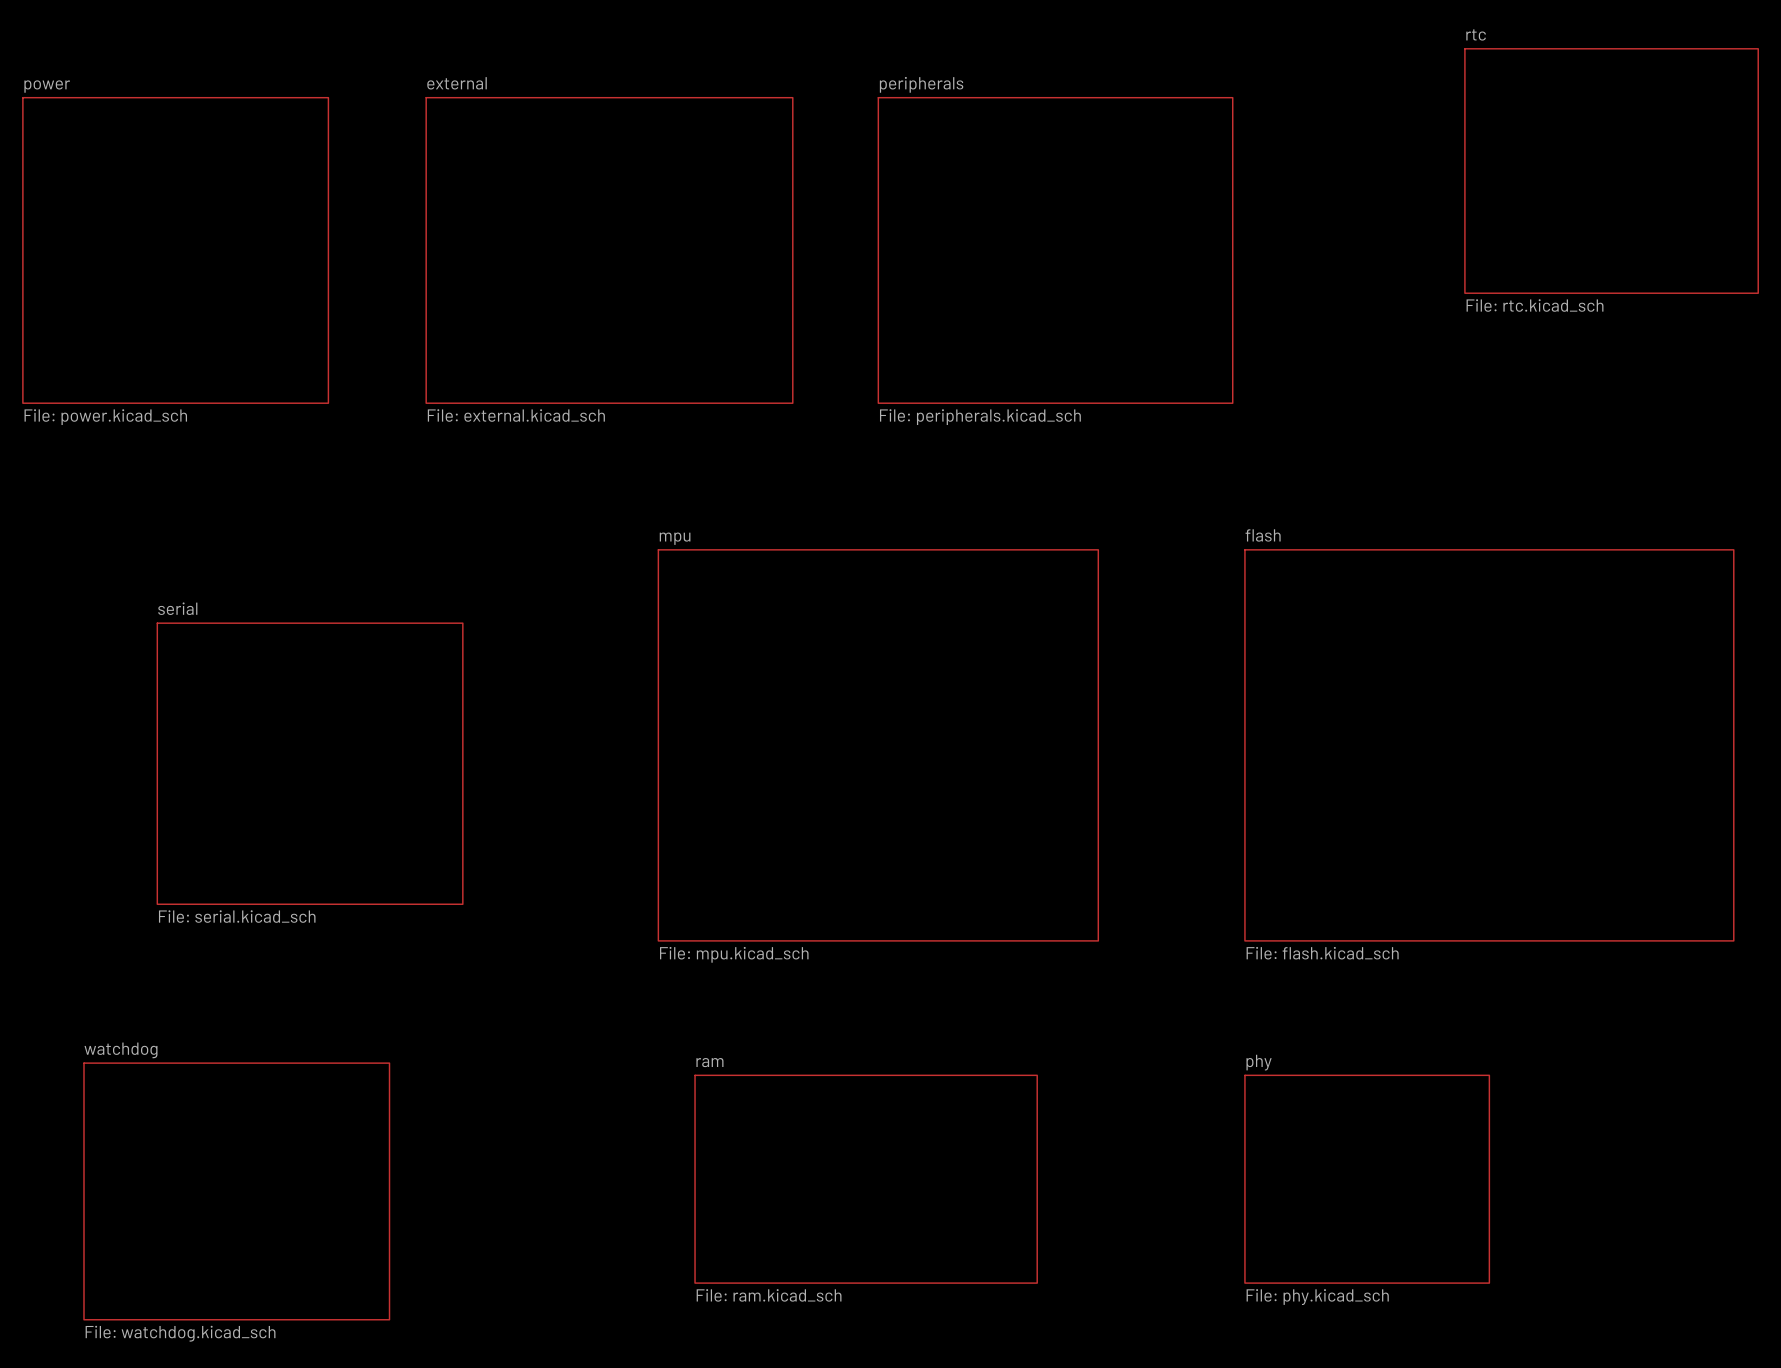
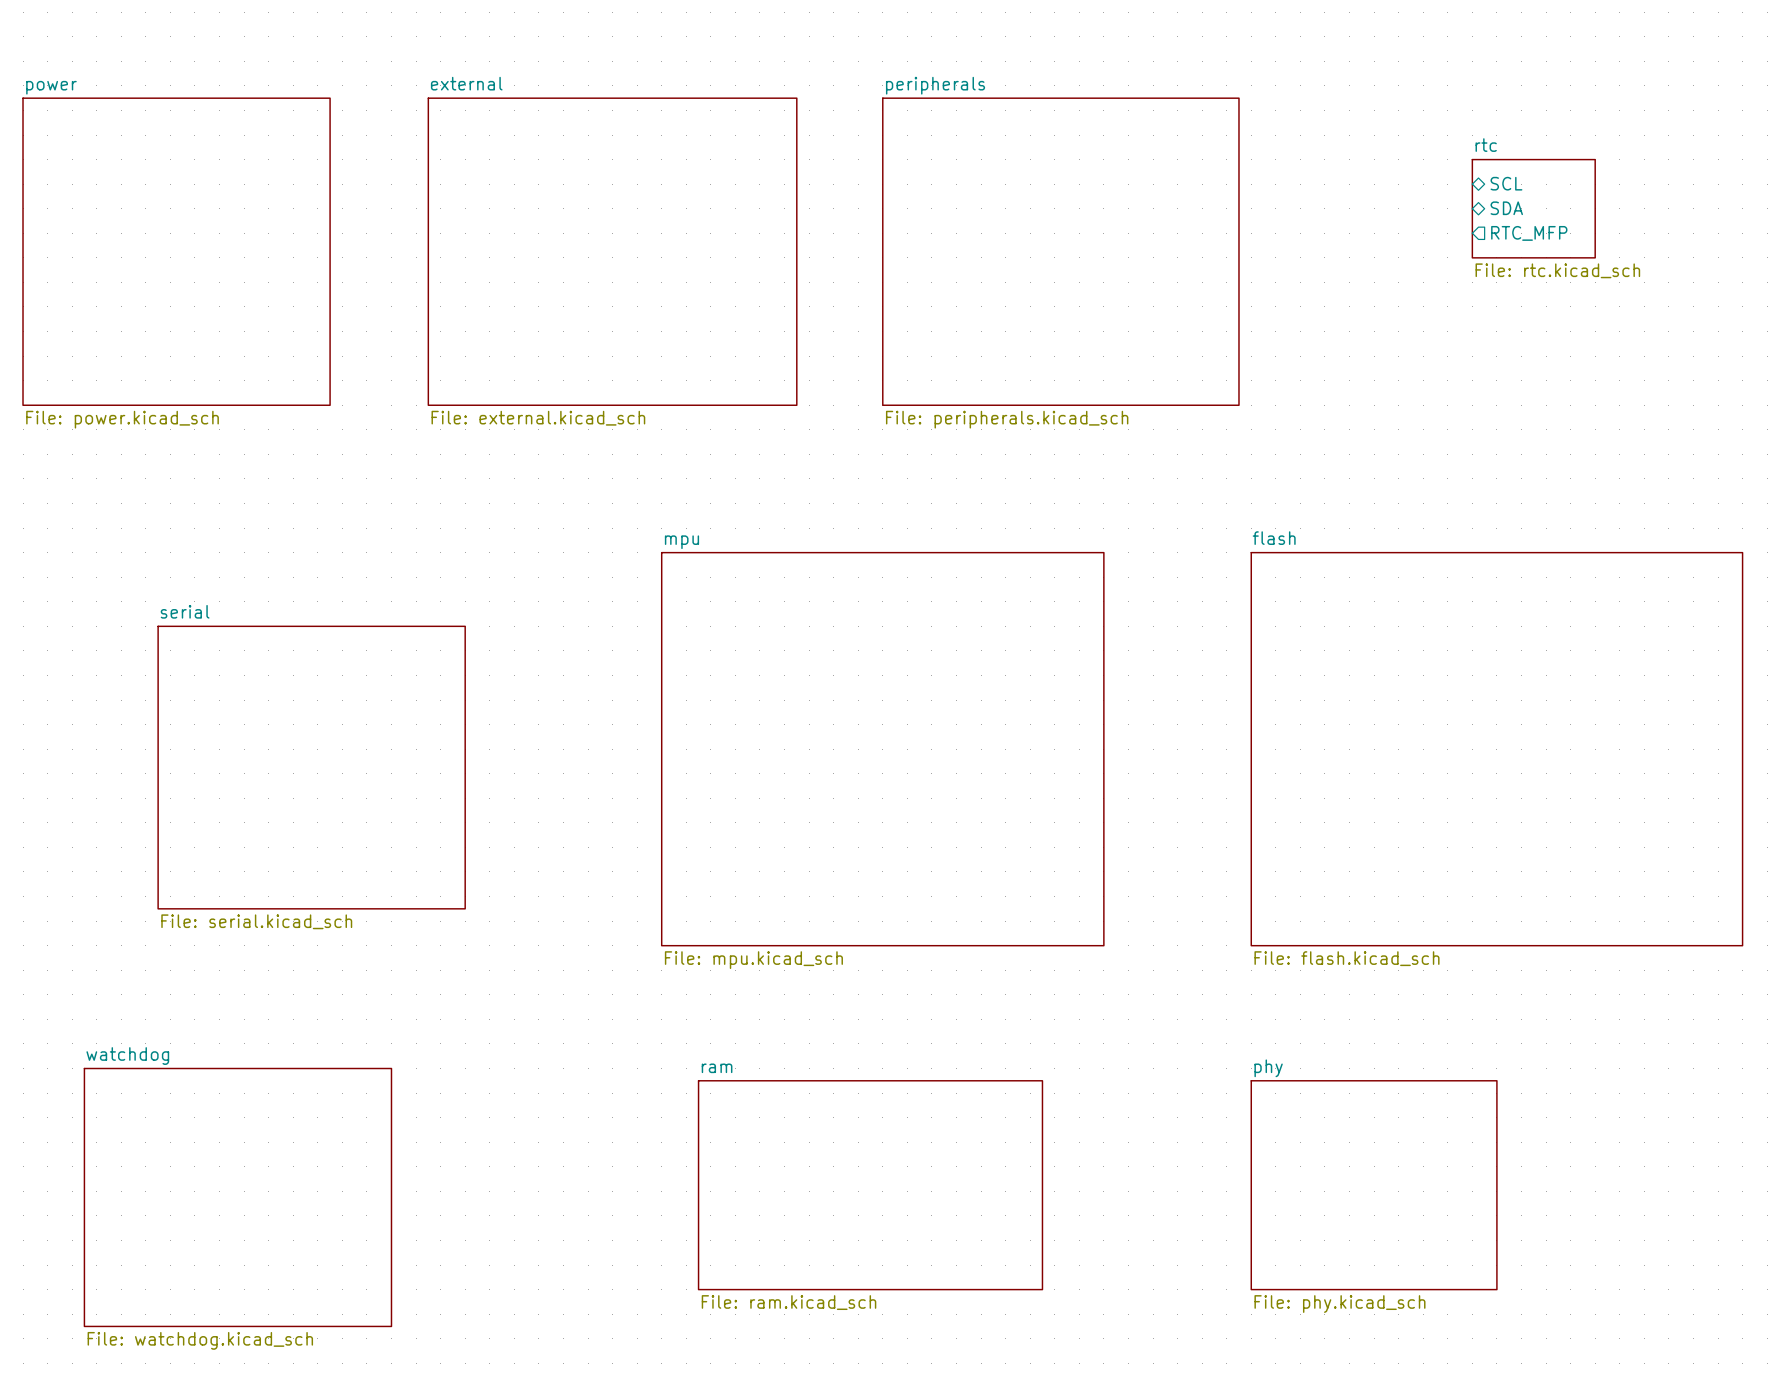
sheet rtc: File: rtc.kicad_sch (1611, 171) -> none
sheet pin: none -> SCL (1506, 183)
sheet pin: none -> SDA (1506, 208)
sheet rtc: none -> File: rtc.kicad_sch (1533, 208)
sheet pin: none -> RTC_MFP (1529, 233)

